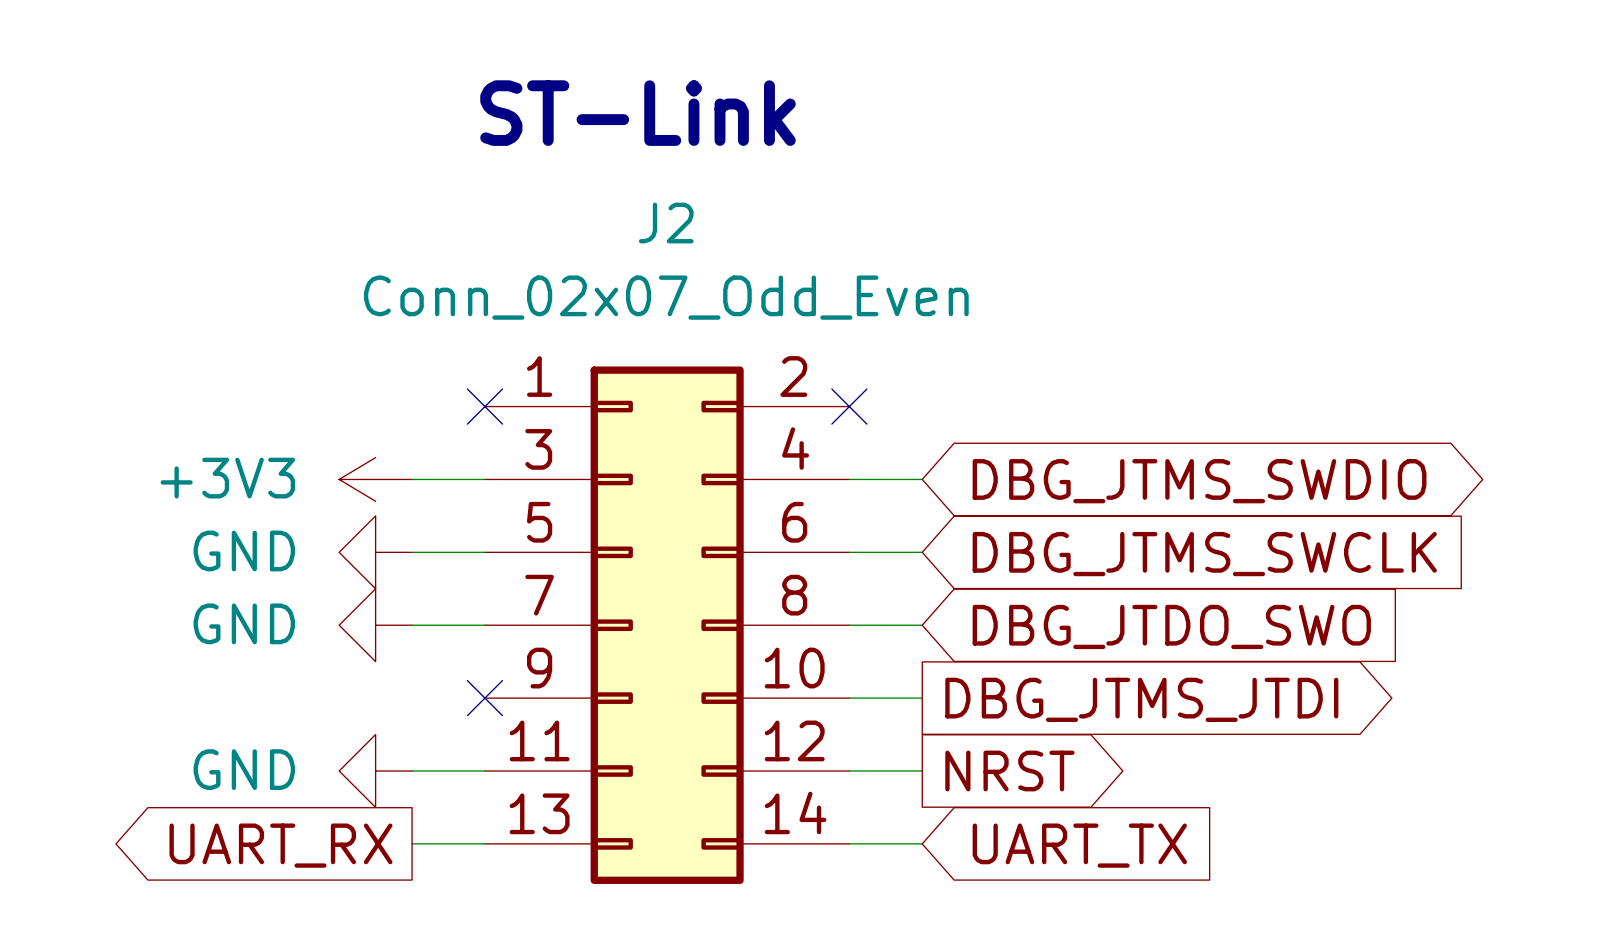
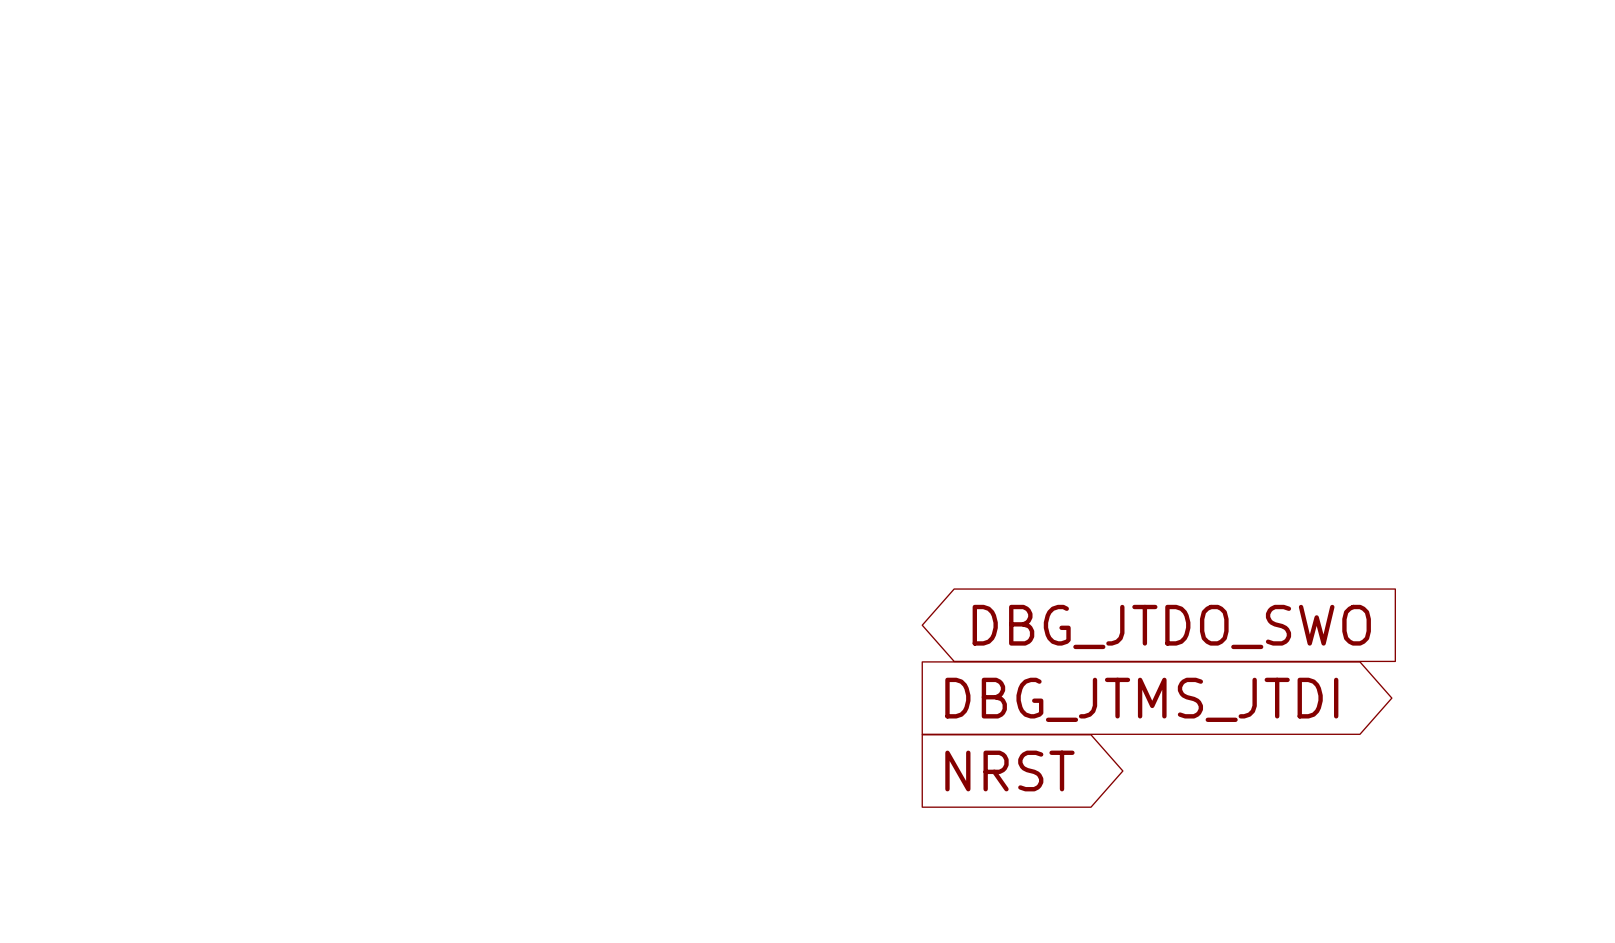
text: ST-Link (638, 113) -> none
no-connect mark: (484, 406) -> none
no-connect mark: (849, 406) -> none
power symbol: +3V3 (375, 479) -> none
wire: (412, 479) (484, 479) -> none
wire: (849, 479) (922, 479) -> none
global label: DBG_JTMS_SWDIO (1199, 481) -> none
power symbol: GND (375, 552) -> none
wire: (412, 552) (484, 552) -> none
wire: (849, 552) (922, 552) -> none
global label: DBG_JTMS_SWCLK (1204, 554) -> none
power symbol: GND (375, 625) -> none
wire: (412, 625) (484, 625) -> none
J2: Conn_02x07_Odd_Even (667, 625) -> none
wire: (849, 625) (922, 625) -> none
no-connect mark: (484, 698) -> none
wire: (849, 698) (922, 698) -> none
power symbol: GND (375, 770) -> none
wire: (412, 770) (484, 770) -> none
wire: (849, 770) (922, 770) -> none
wire: (412, 843) (484, 843) -> none
wire: (849, 843) (922, 843) -> none
global label: UART_RX (280, 845) -> none
global label: UART_TX (1079, 845) -> none

